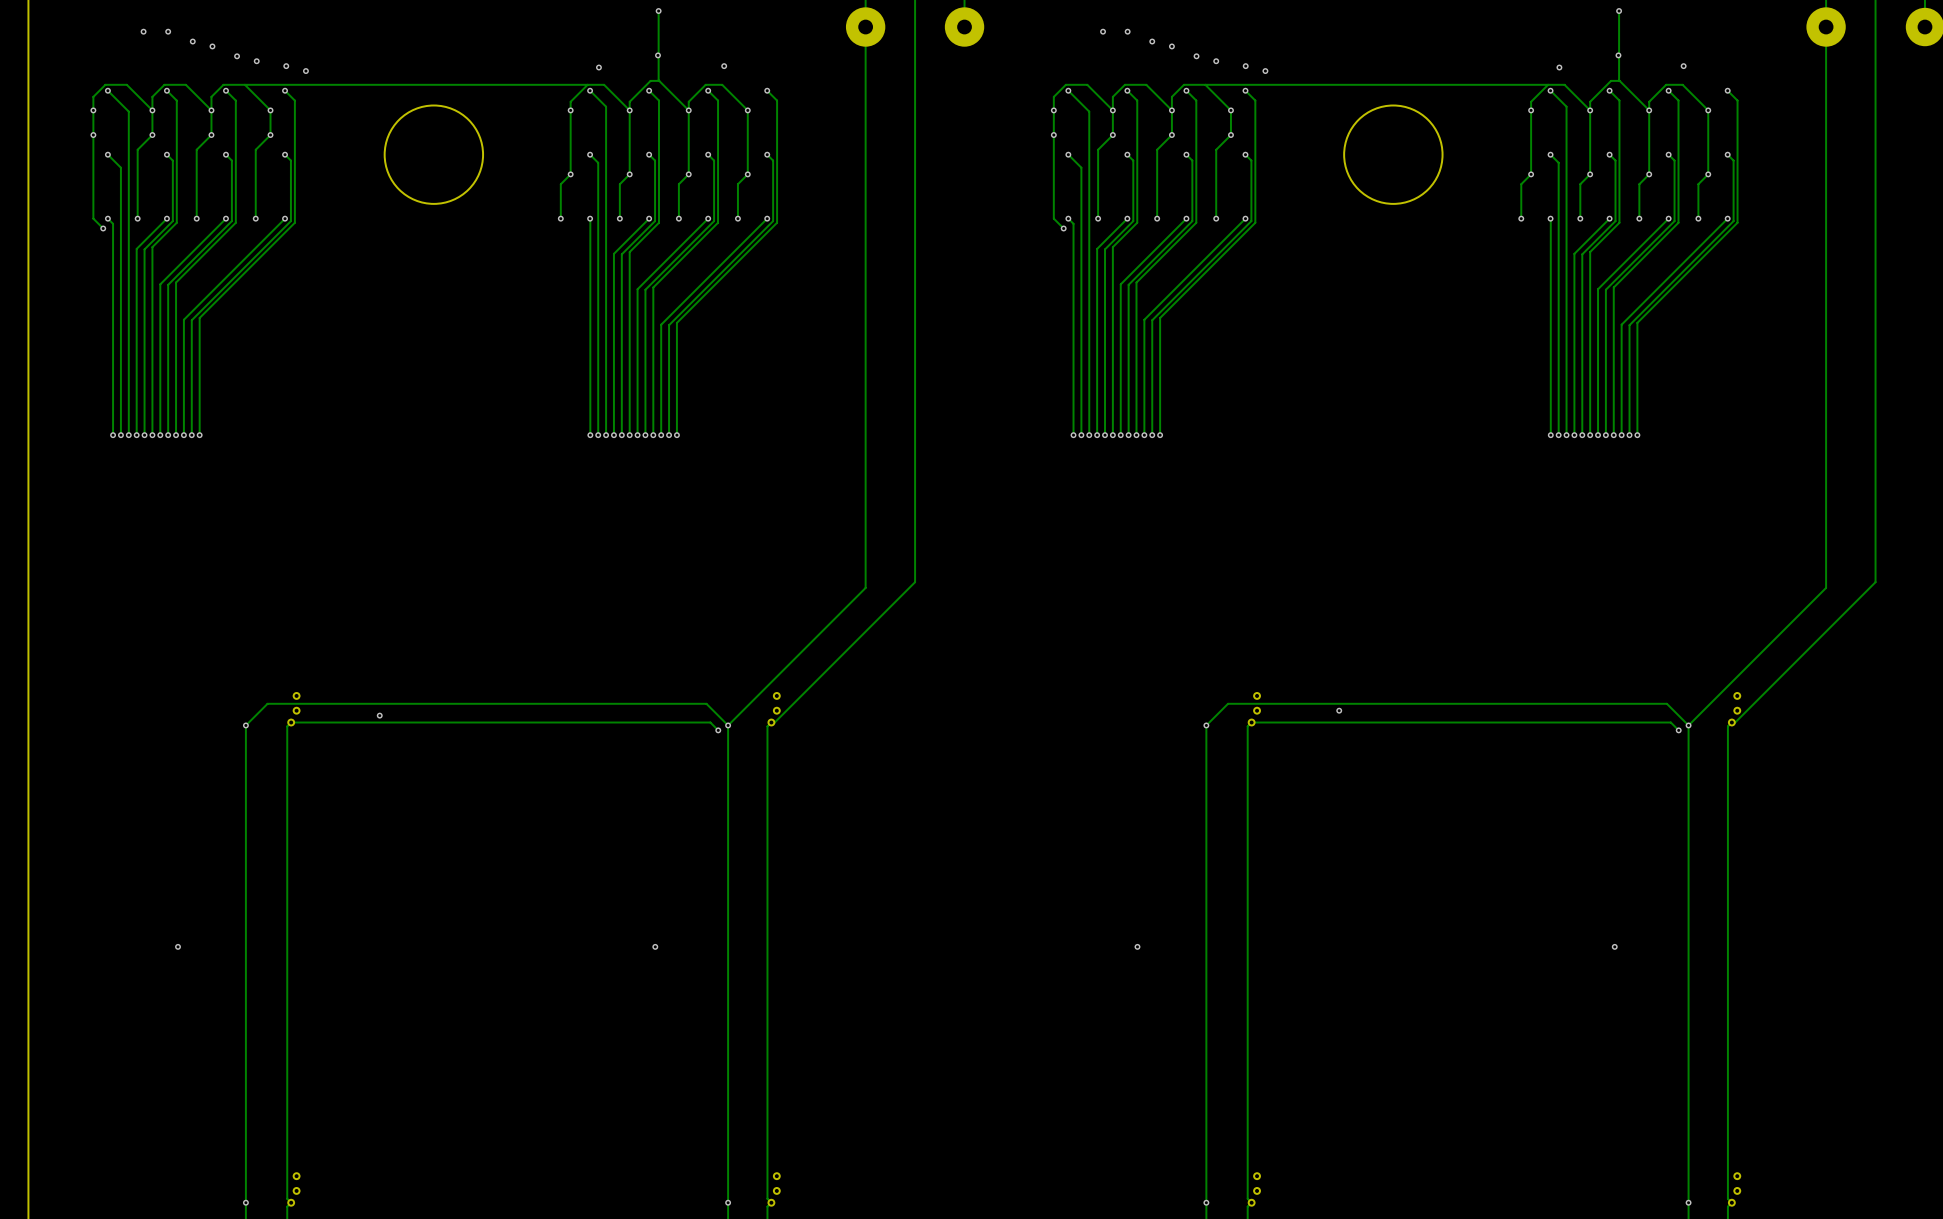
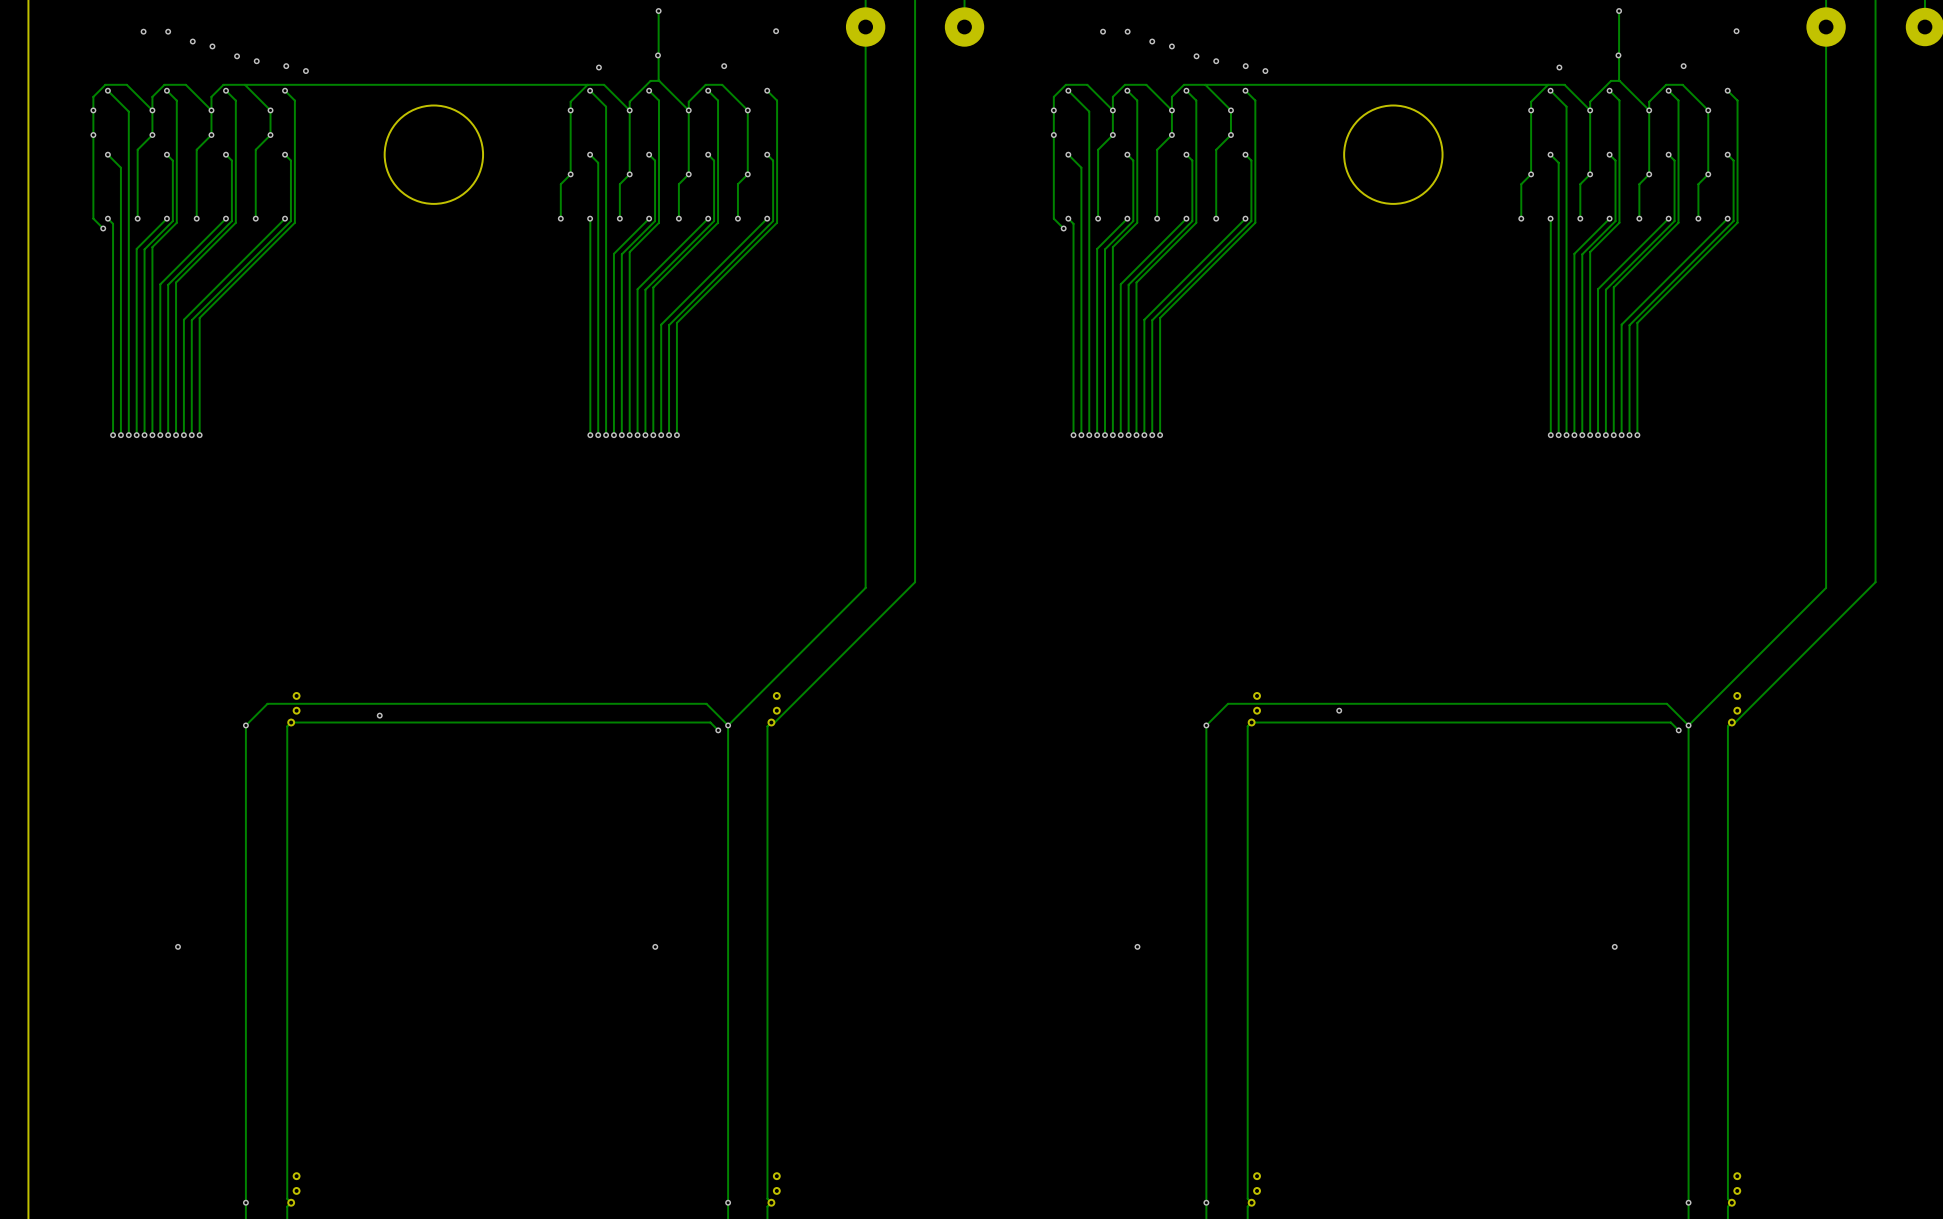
via: none -> (776, 31)
via: none -> (1736, 31)

